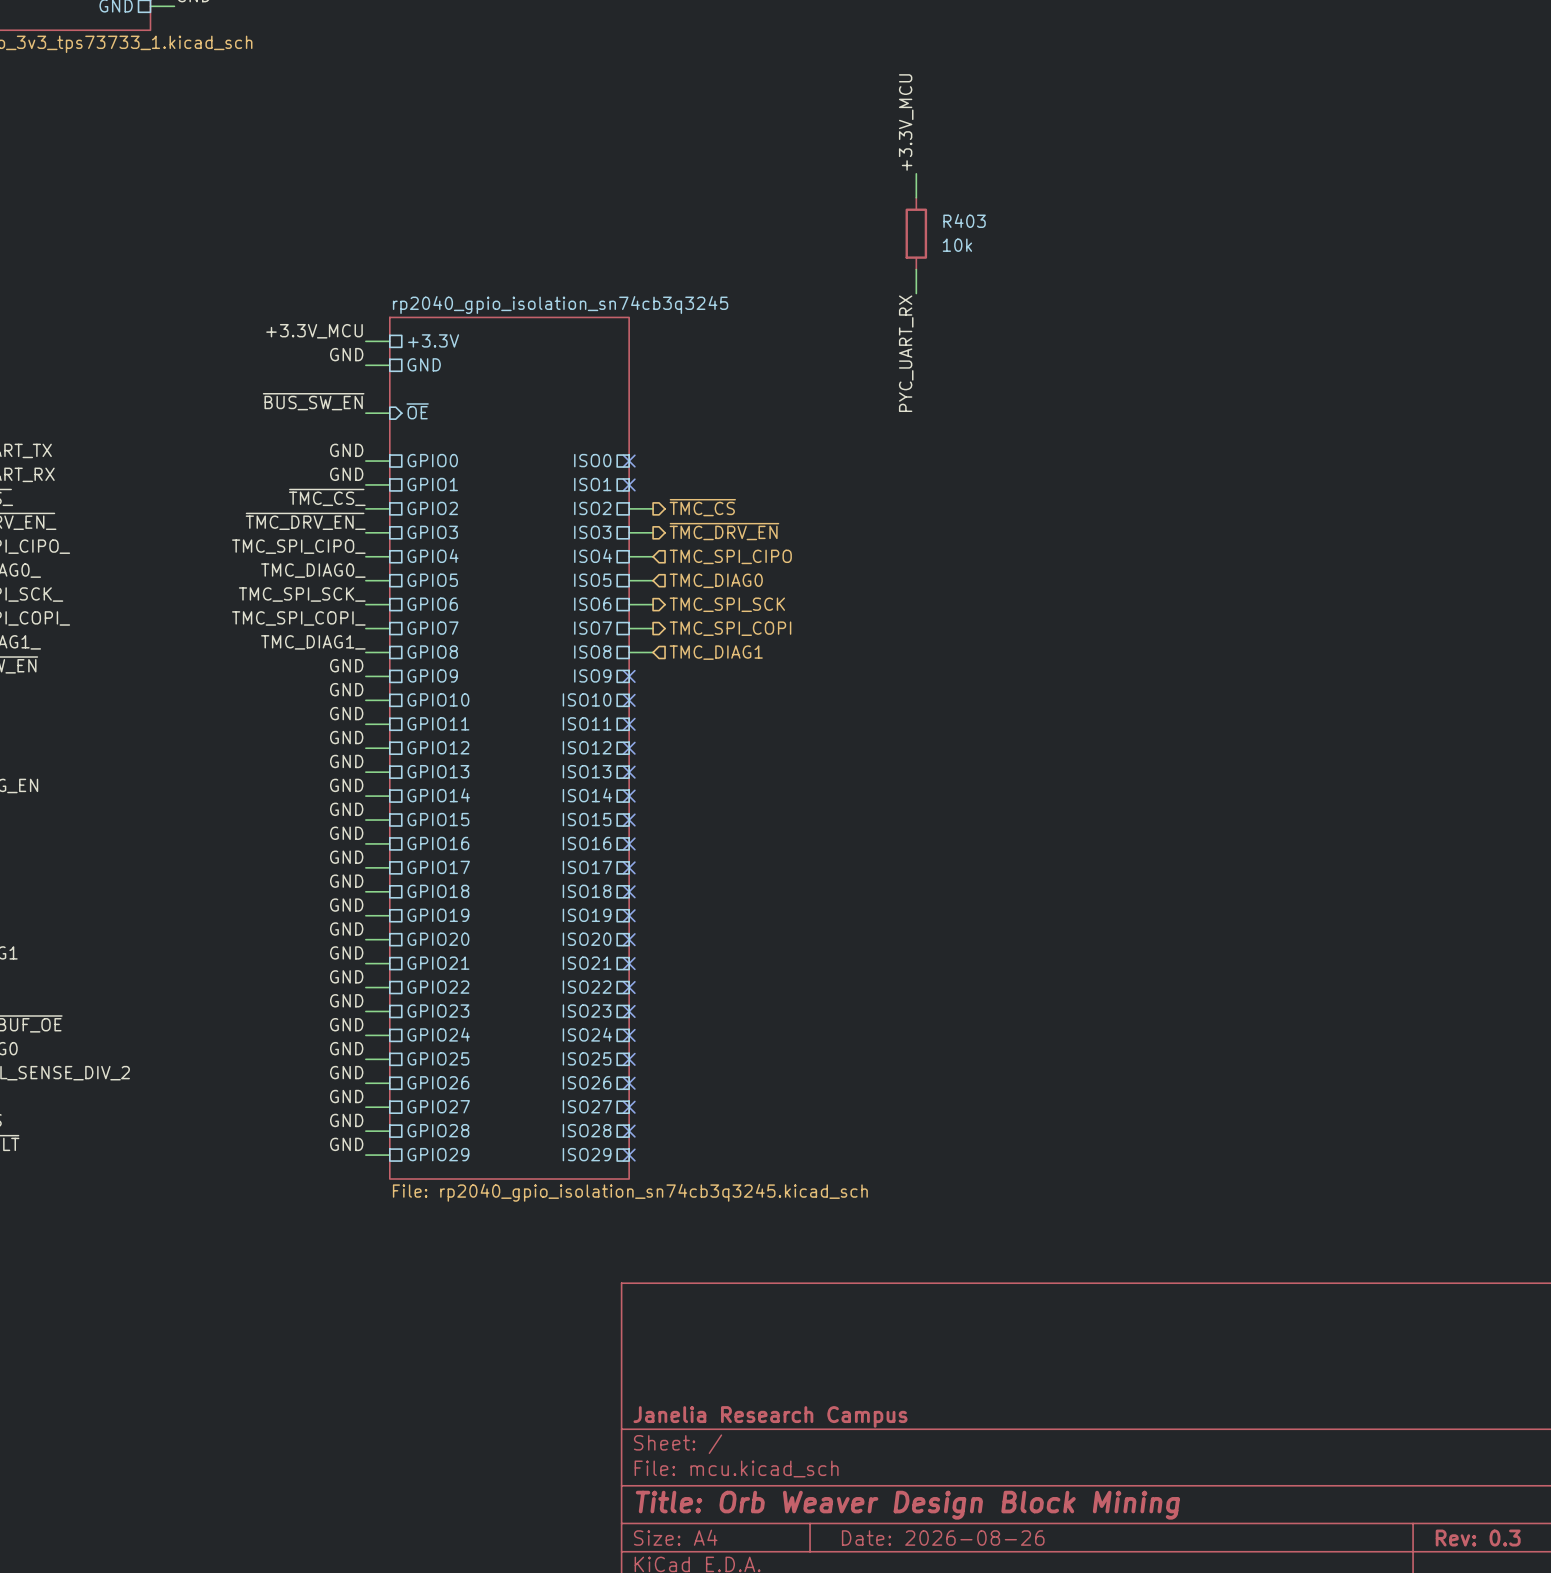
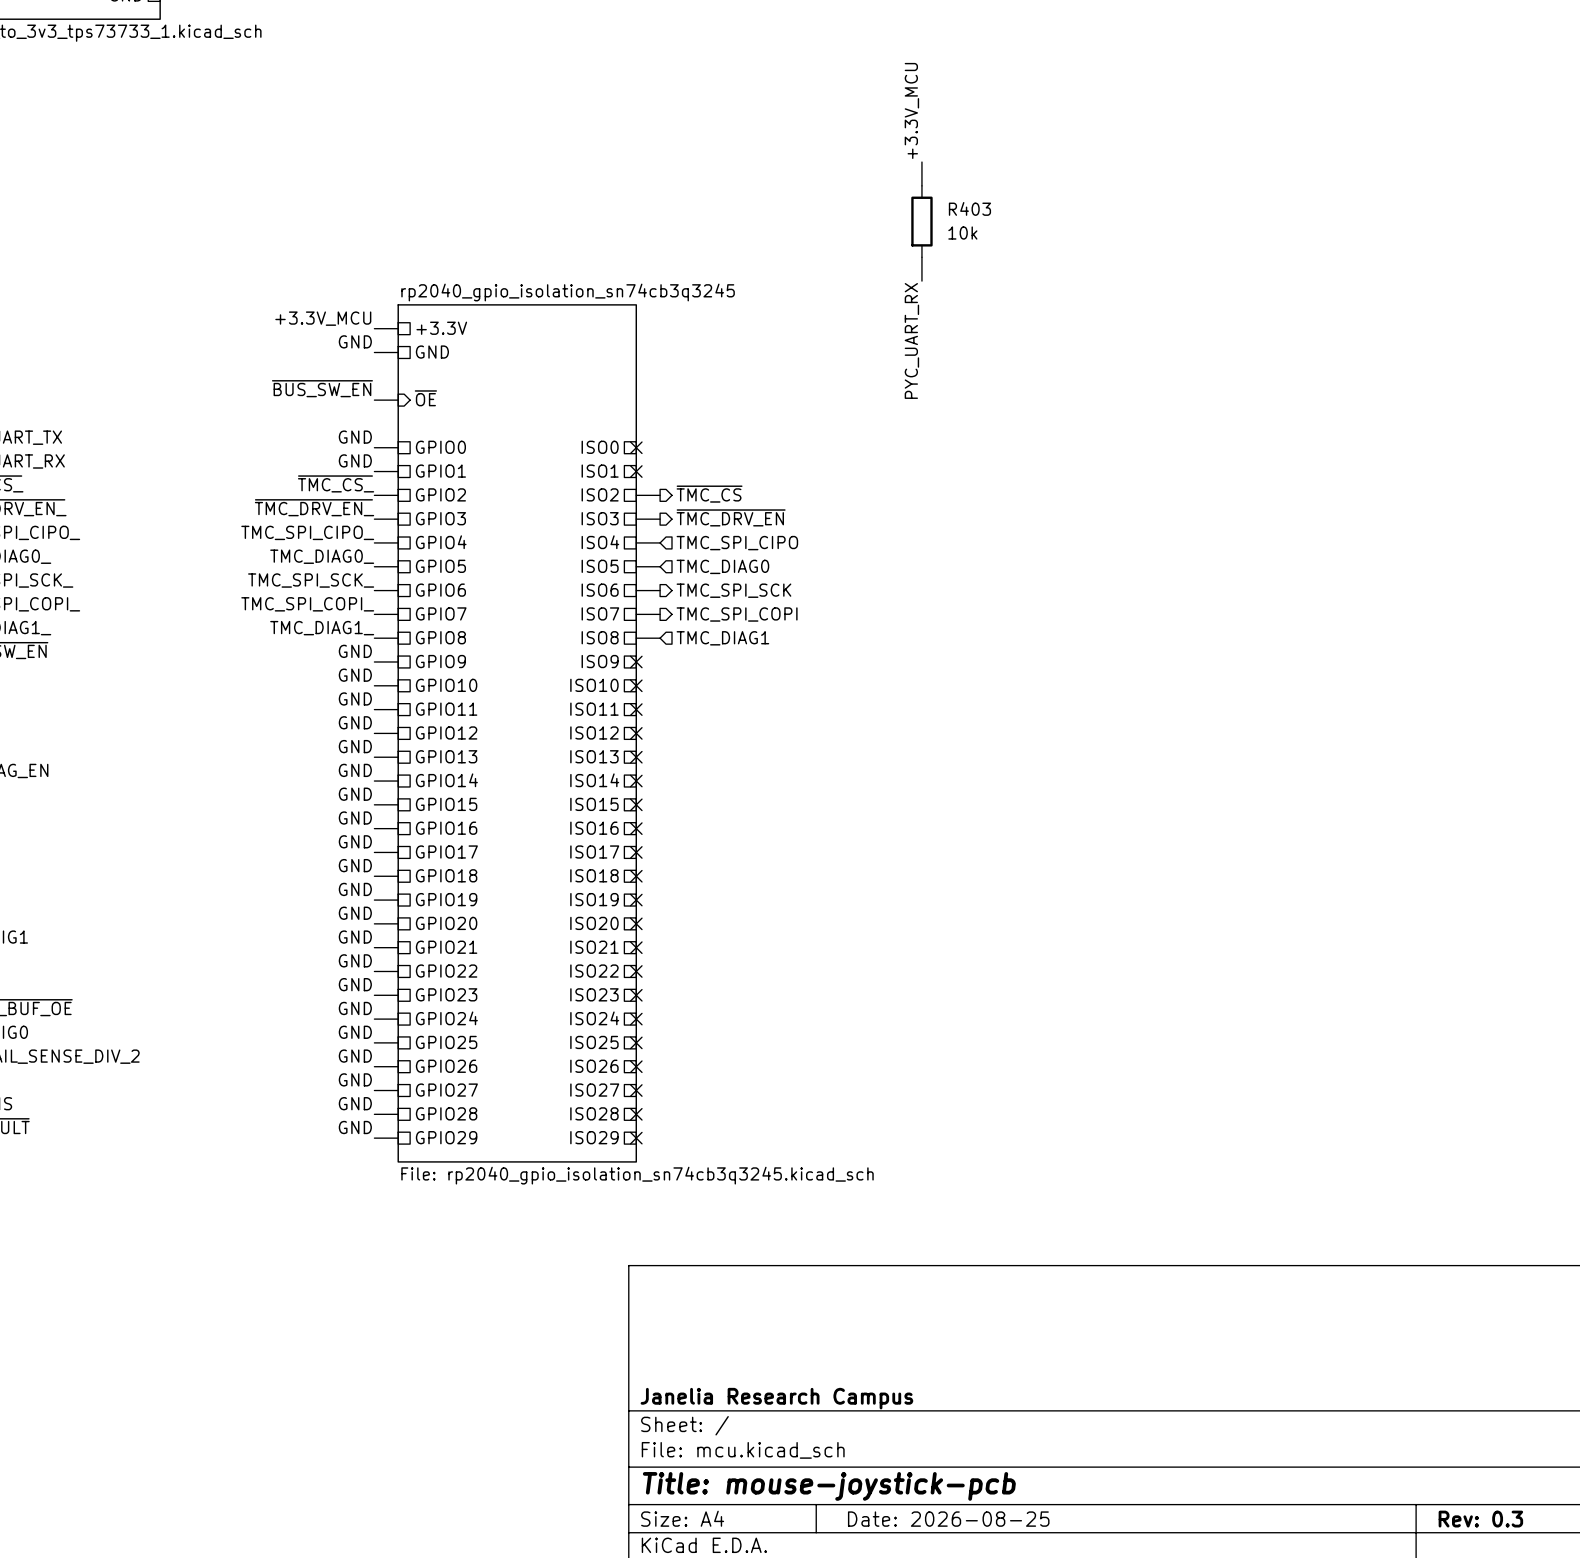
title block: Title: Orb Weaver Design Block Mining (907, 1505) -> Title: mouse-joystick-pcb (829, 1486)
title block: Date: 2026-08-26 (943, 1538) -> Date: 2026-08-25 (948, 1519)

